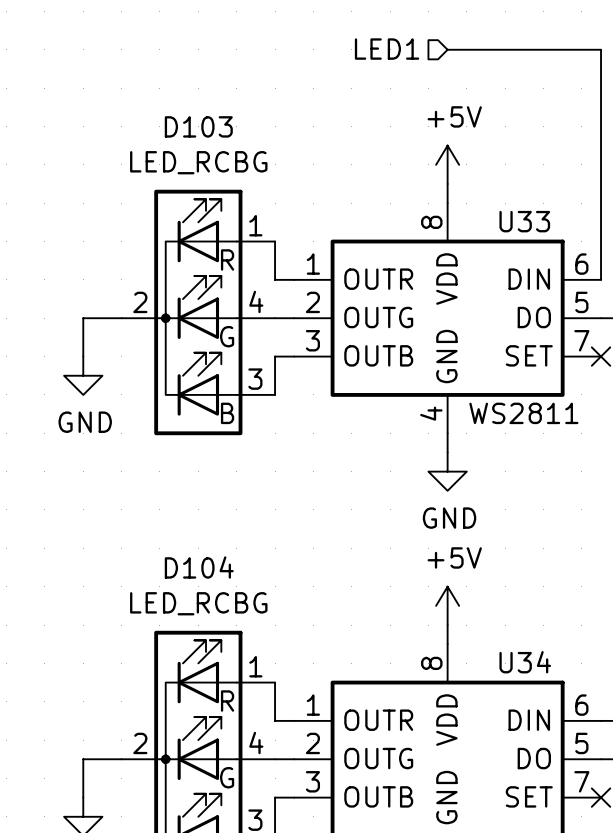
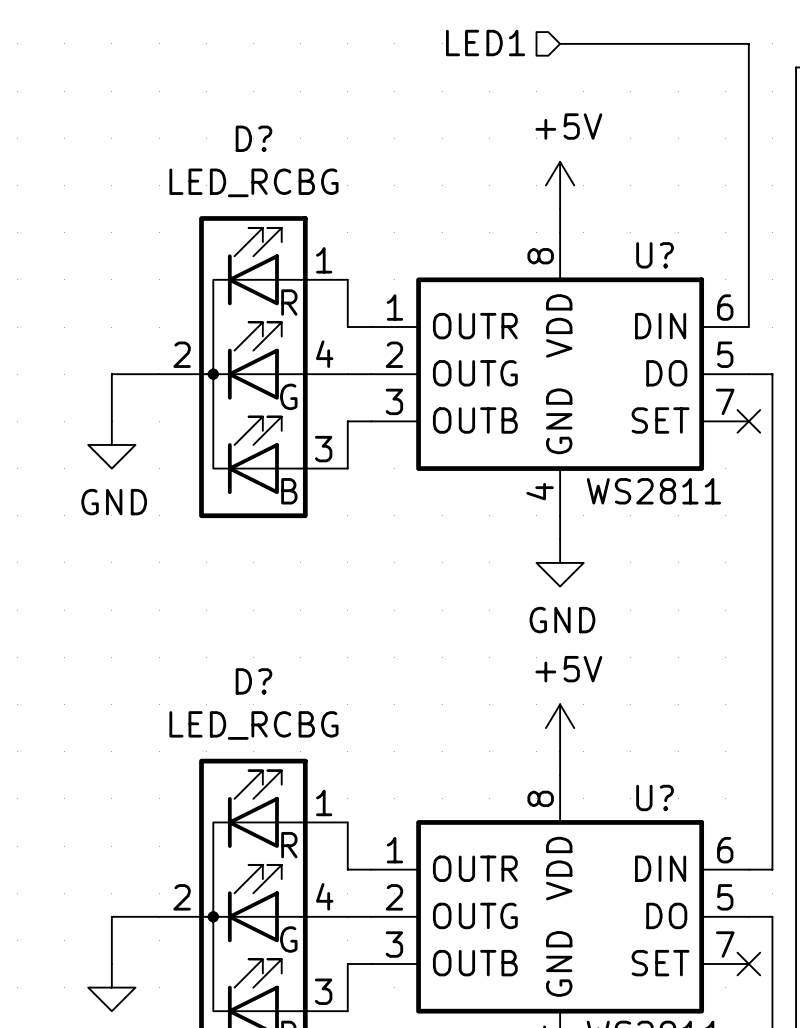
D103 name: D103 (198, 126) -> D? (253, 138)
U33 name: U33 (524, 221) -> U? (655, 255)
D104 name: D104 (199, 567) -> D? (253, 681)
U34 name: U34 (525, 662) -> U? (655, 797)

